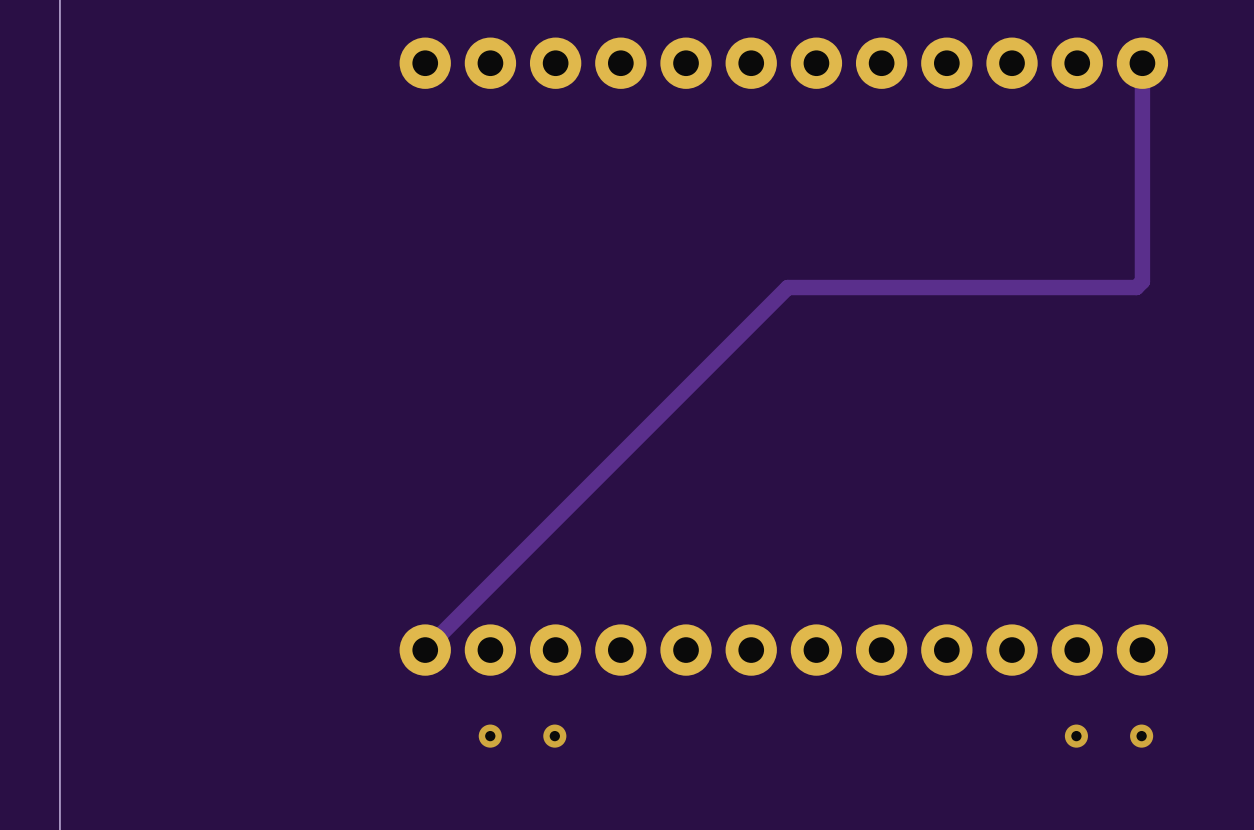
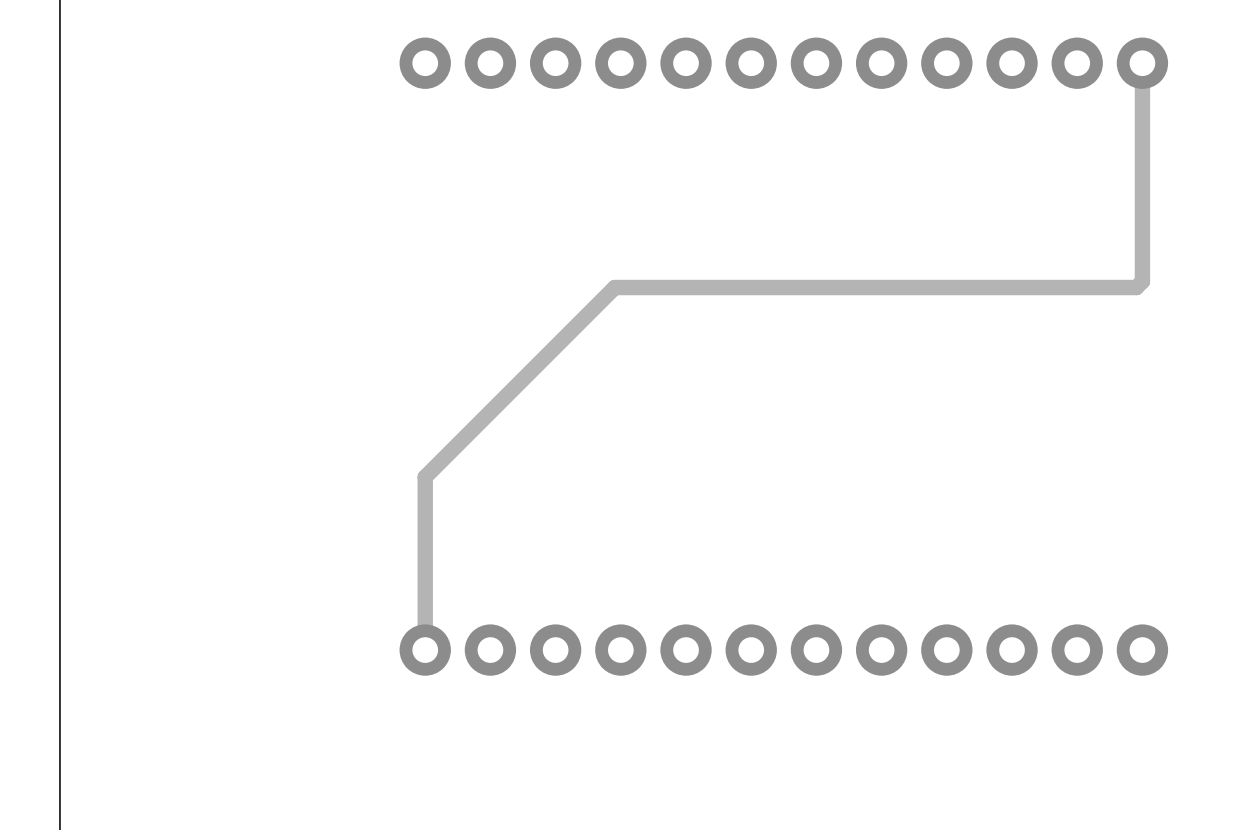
track: (787, 287) (425, 650) -> (787, 287) (614, 287) (425, 477) (425, 650)
via: (490, 736) -> none
via: (554, 736) -> none
via: (1076, 736) -> none
via: (1141, 736) -> none

